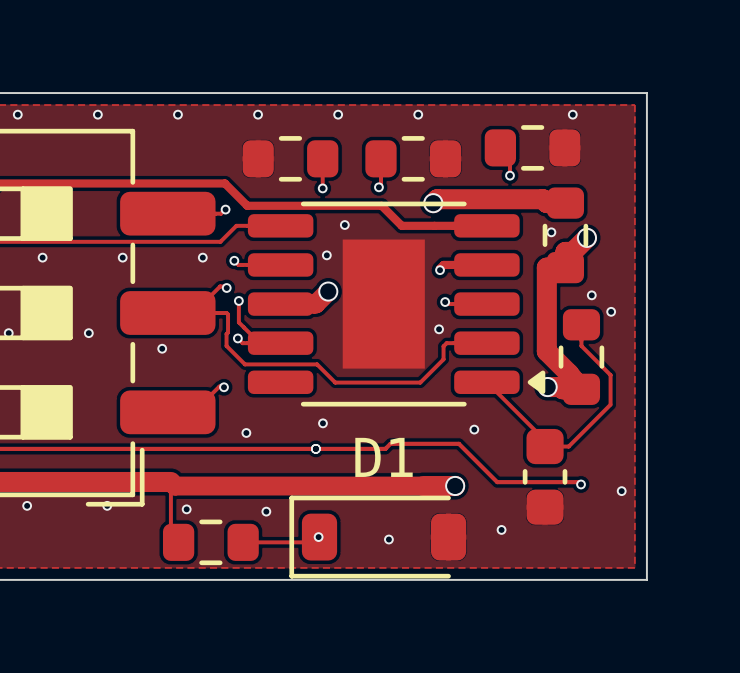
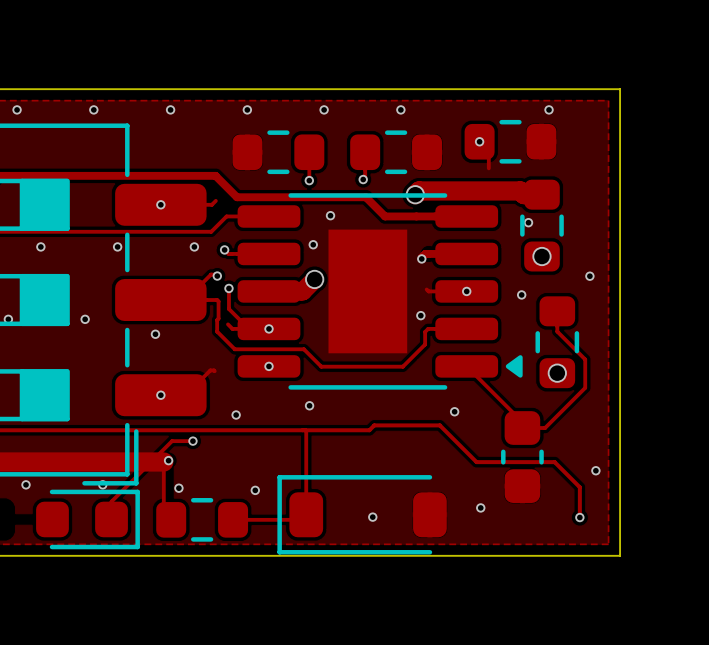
via position: (509, 175) -> (479, 141)
via position: (225, 209) -> (160, 204)
track: (586, 237) (572, 251) (565, 251) (565, 267) (546, 267) (546, 351) (581, 389) (547, 387) -> none
via position: (586, 237) -> (541, 256)
via: none -> (589, 276)
via: (591, 295) -> none
via position: (445, 302) -> (466, 291)
via: none -> (521, 294)
via: (611, 311) -> none
via: (237, 338) -> none
via: none -> (268, 328)
via: none -> (268, 366)
via: (224, 387) -> none
via position: (547, 387) -> (557, 373)
via: none -> (160, 395)
via: (315, 448) -> none
track: none -> (305, 430) (306, 514)
D1 name: D1 (384, 457) -> none
track: none -> (192, 441) (172, 441) (111, 501) (111, 519)
via: none -> (192, 441)
via: none -> (168, 460)
track: (170, 481) (174, 486) (455, 486) -> none
track: none -> (556, 464) (579, 487) (579, 517)
via position: (581, 484) -> (579, 517)
via: (455, 485) -> none
via: (318, 537) -> none
part: none -> (88, 519)

